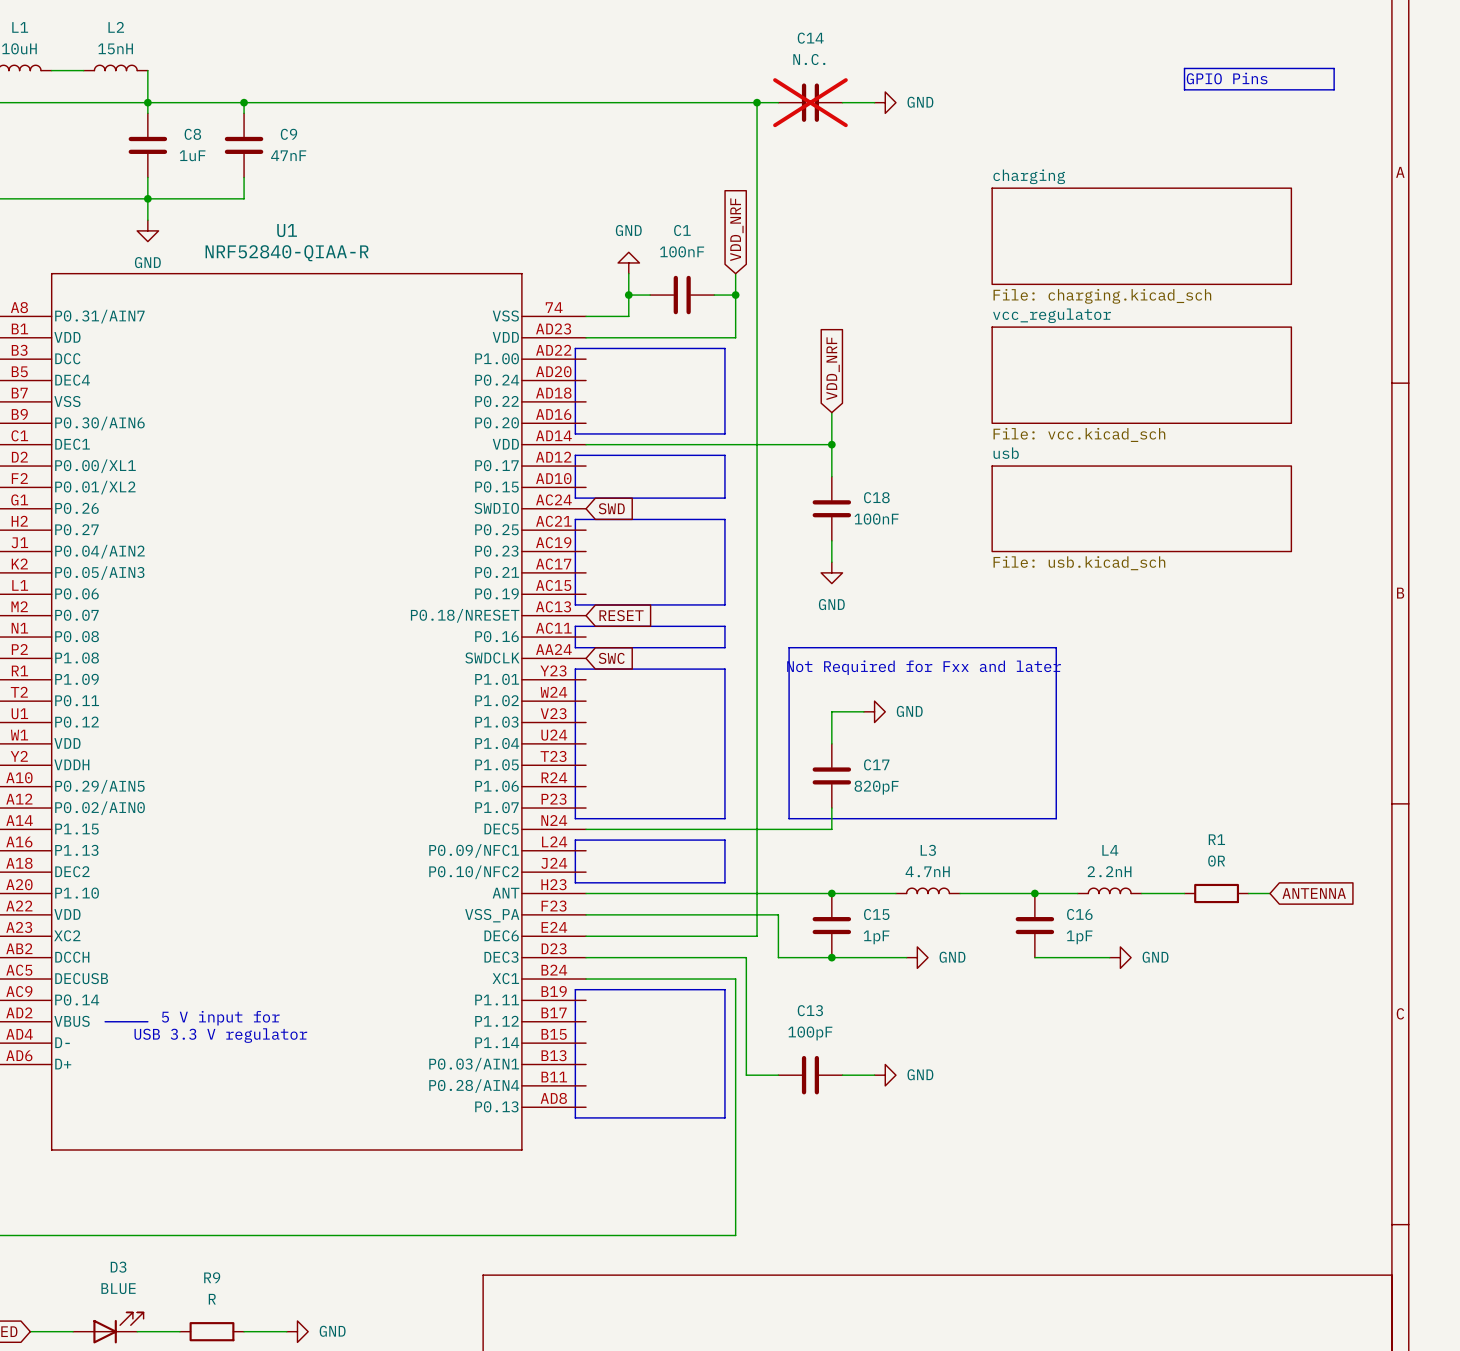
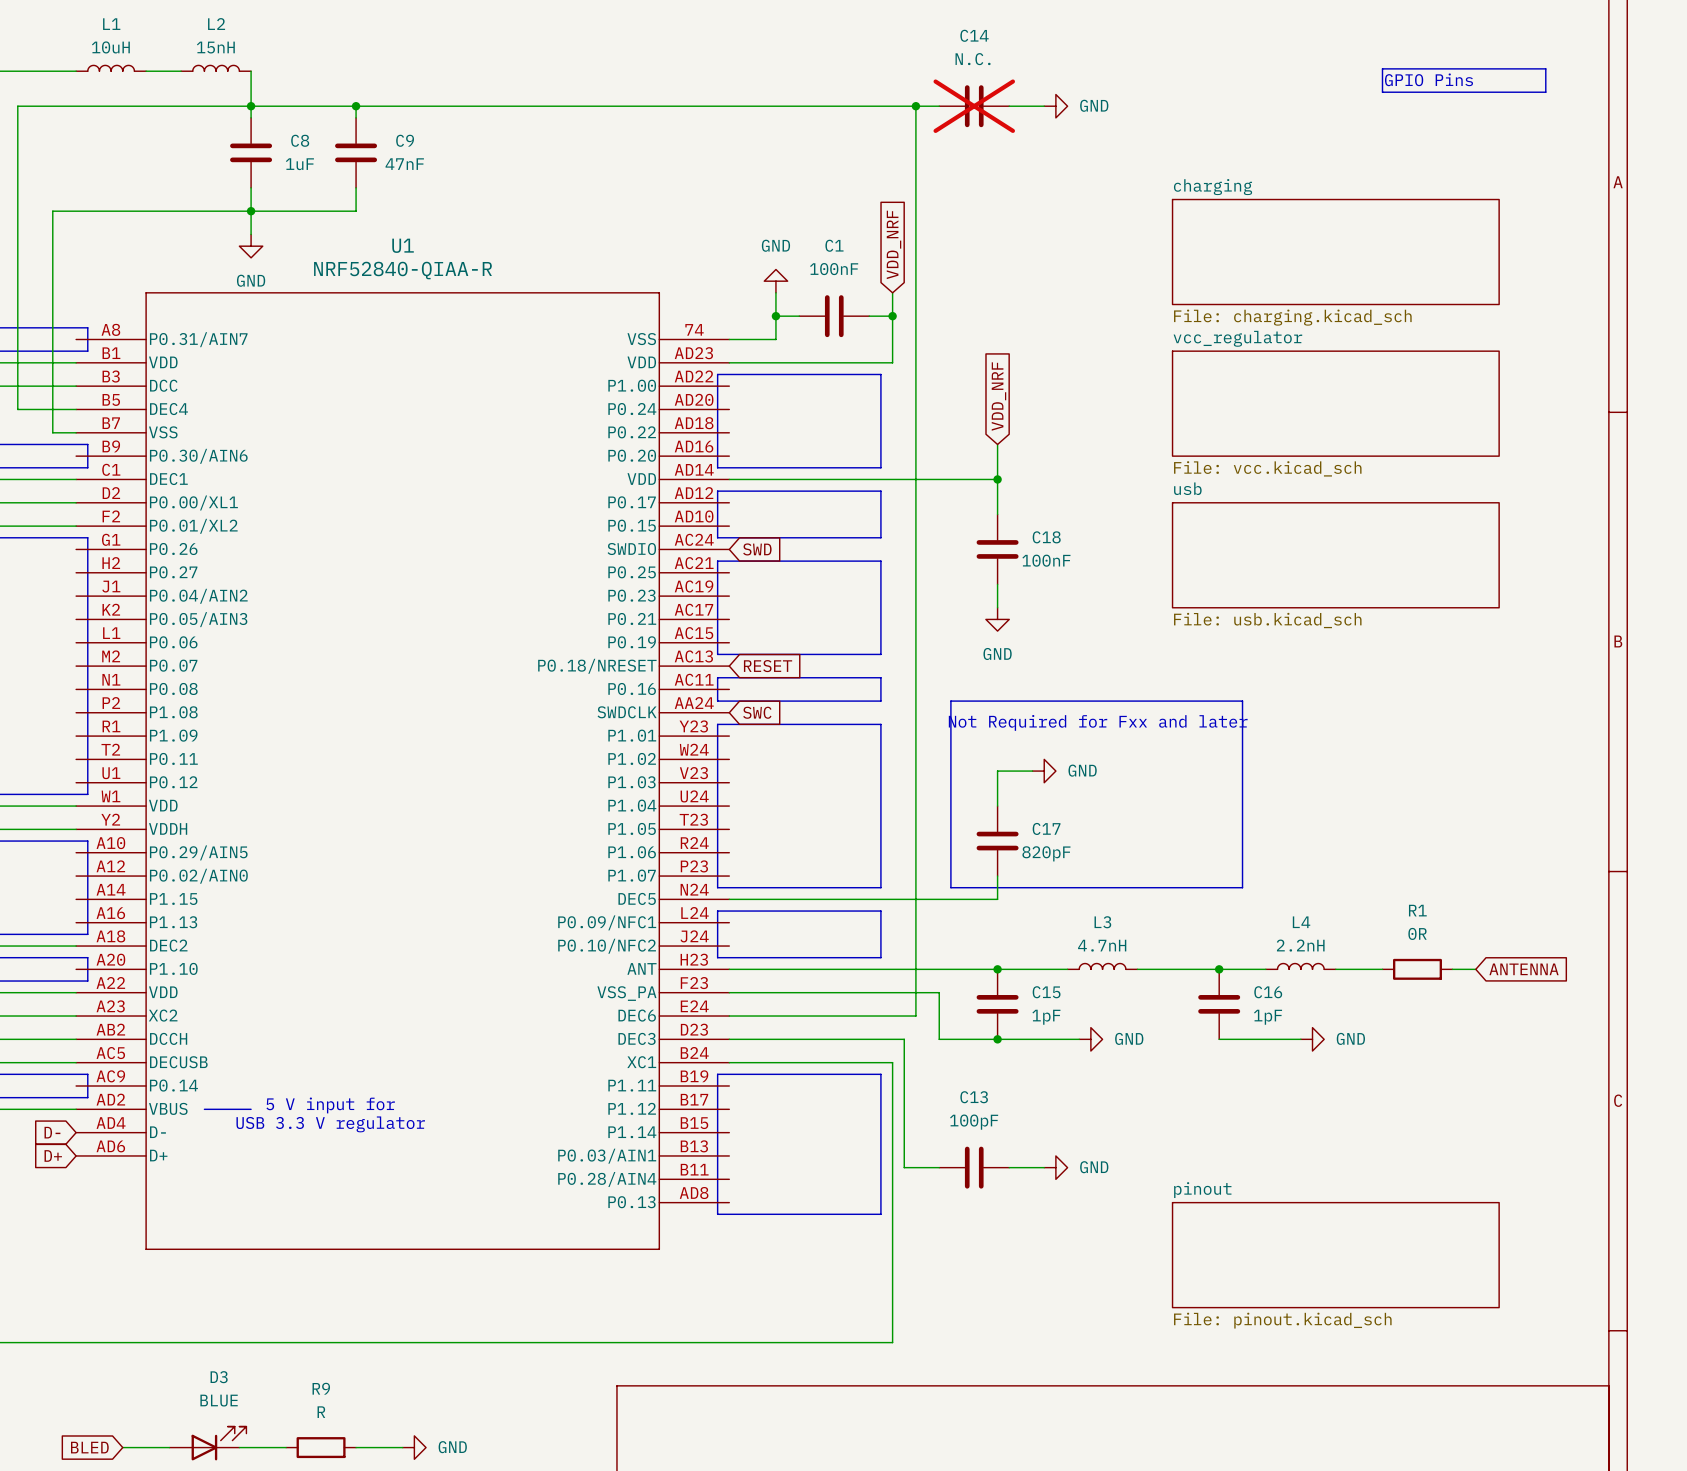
sheet usb shape: [991, 465, 1293, 553] -> [1171, 502, 1500, 609]
sheet pinout: none -> File: pinout.kicad_sch (1335, 1255)

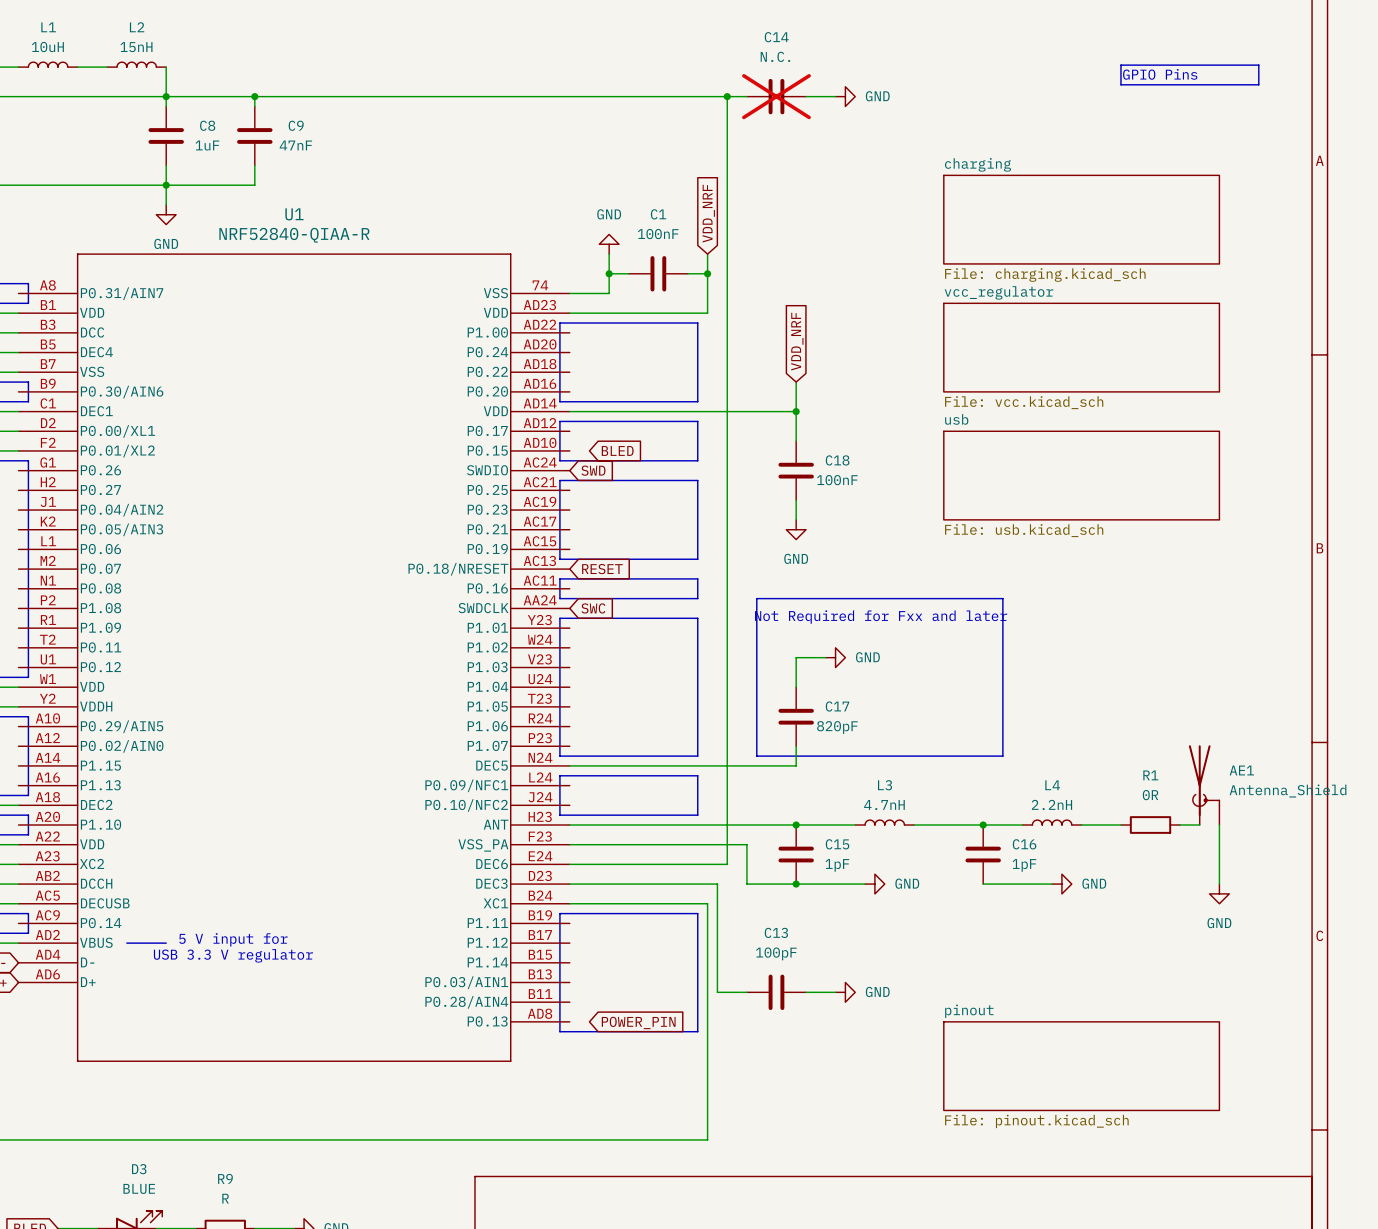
global label: none -> BLED (617, 450)
AE1: none -> Antenna_Shield (1204, 785)
wire: none -> (1219, 825) (1219, 884)
global label: ANTENNA (1524, 969) -> none
power symbol: none -> GND (1219, 893)
global label: none -> POWER_PIN (638, 1022)

